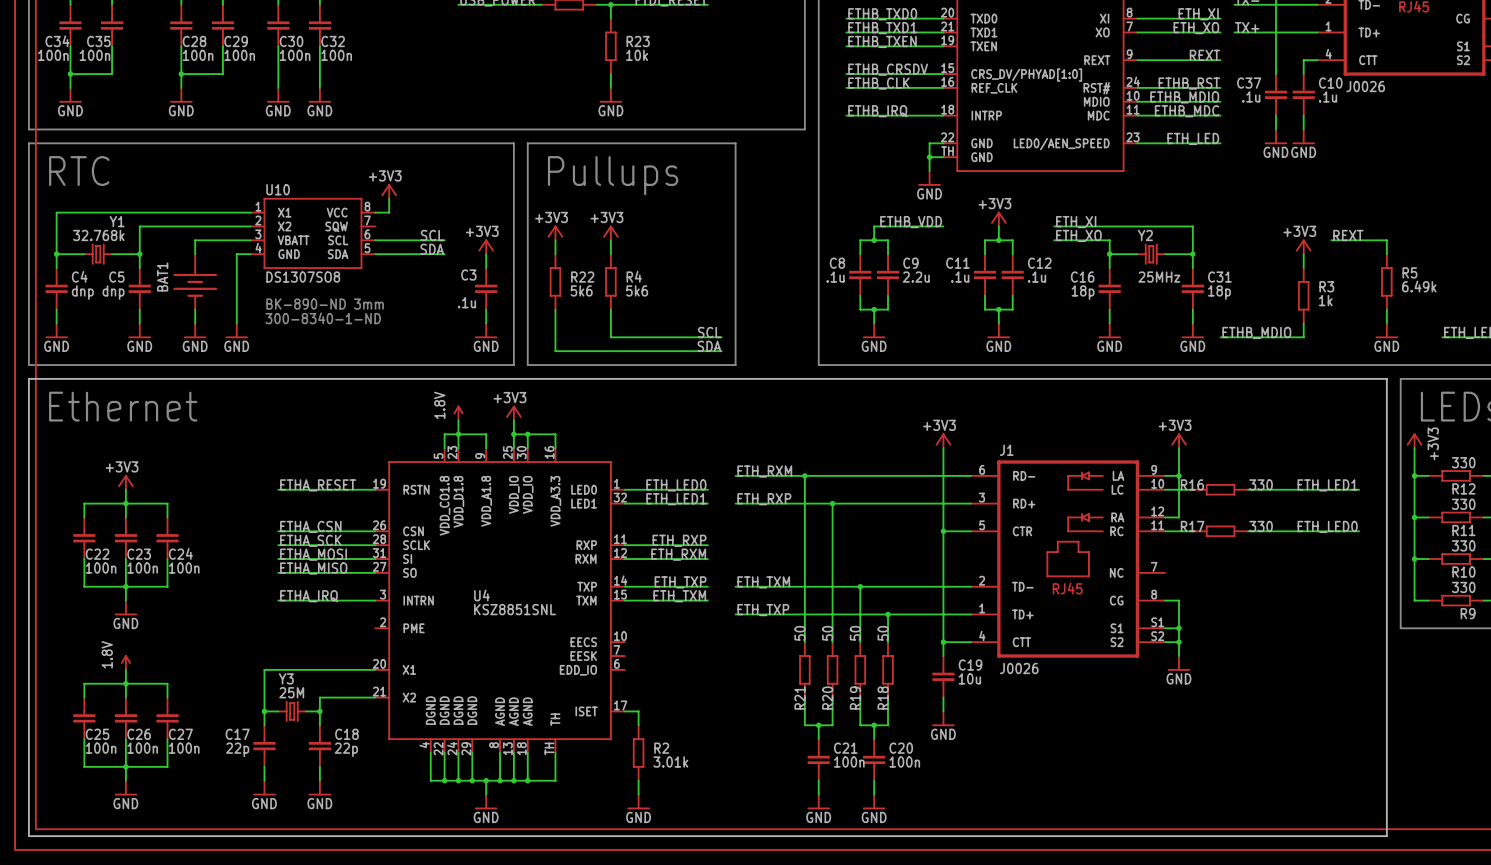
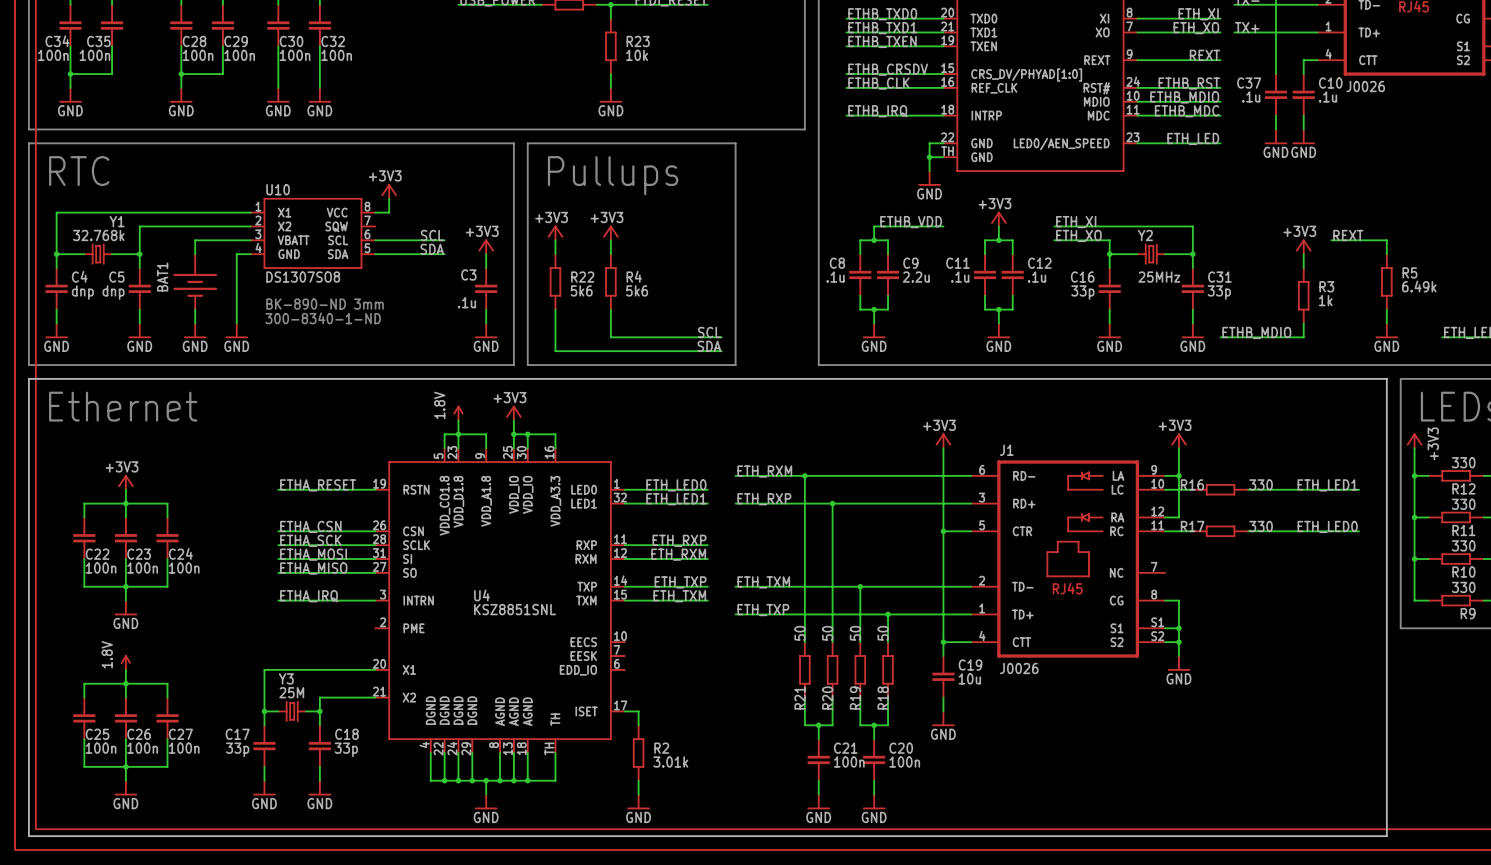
C16 value: 18p (1083, 292) -> 33p (1082, 292)
C31 value: 18p (1219, 292) -> 33p (1219, 292)
C17 value: 22p (237, 749) -> 33p (237, 749)
C18 value: 22p (346, 749) -> 33p (346, 749)

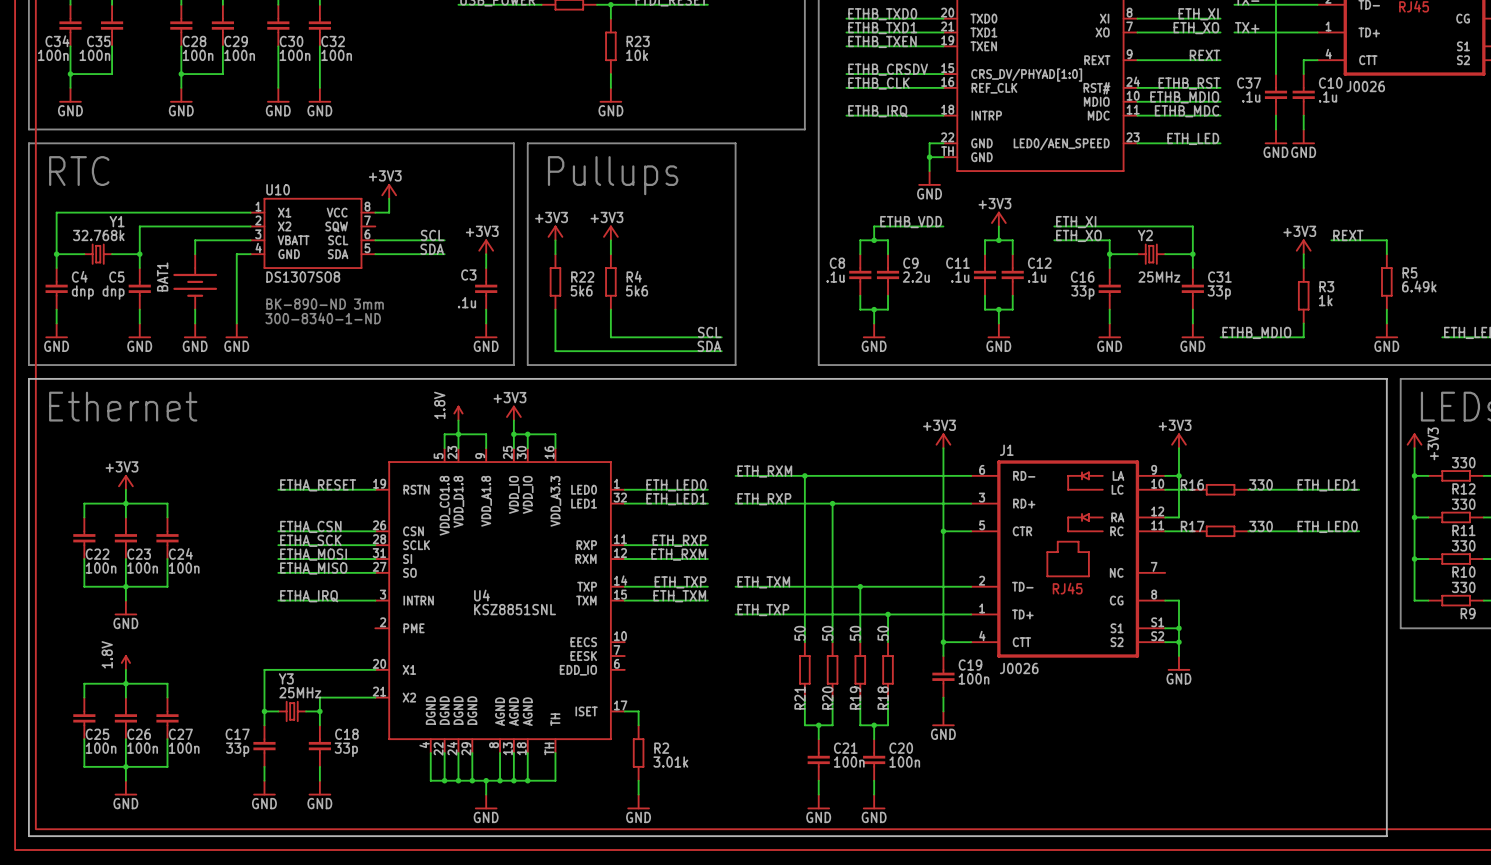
C19 value: 10u (969, 678) -> 100n (974, 678)
Y3 value: 25M (291, 692) -> 25MHz (300, 692)

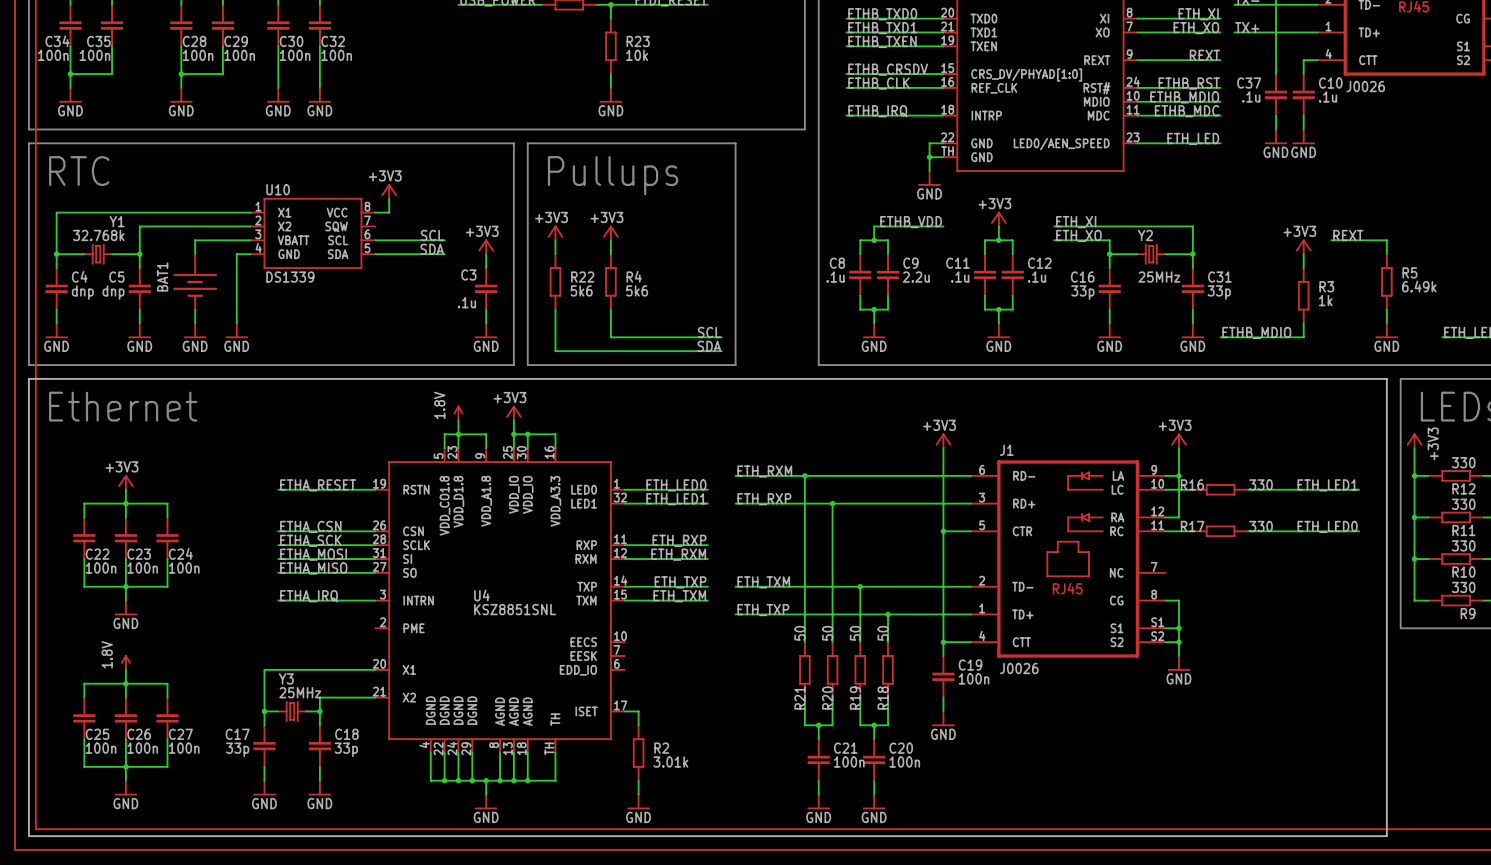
U10 value: DS1307SO8 (303, 277) -> DS1339 (290, 277)
text: BK-890-ND 3mm (325, 304) -> none
text: 300-8340-1-ND (323, 318) -> none

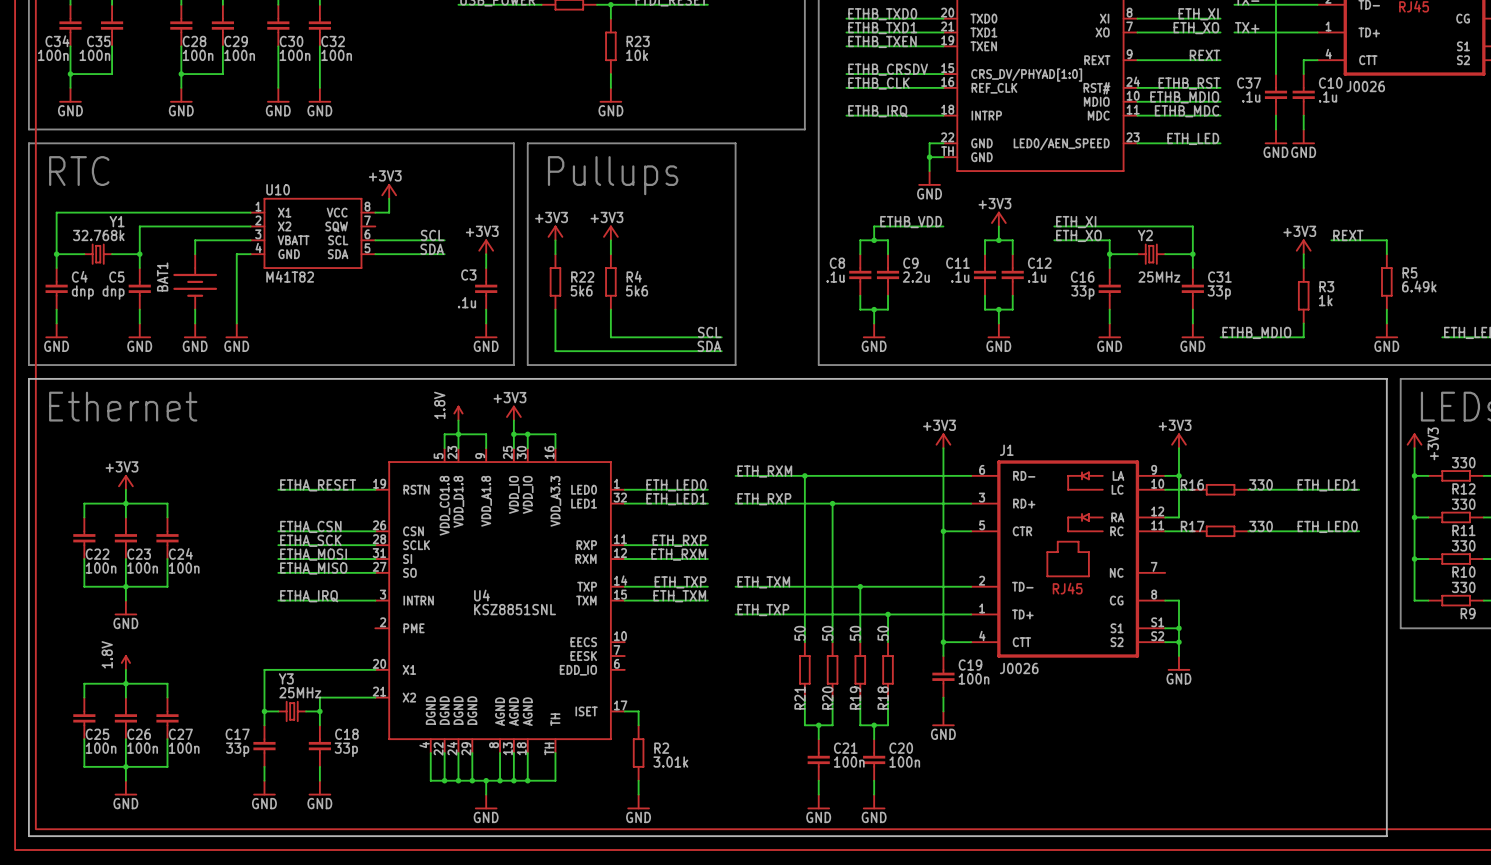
U10 value: DS1339 (290, 277) -> M41T82 (290, 276)

